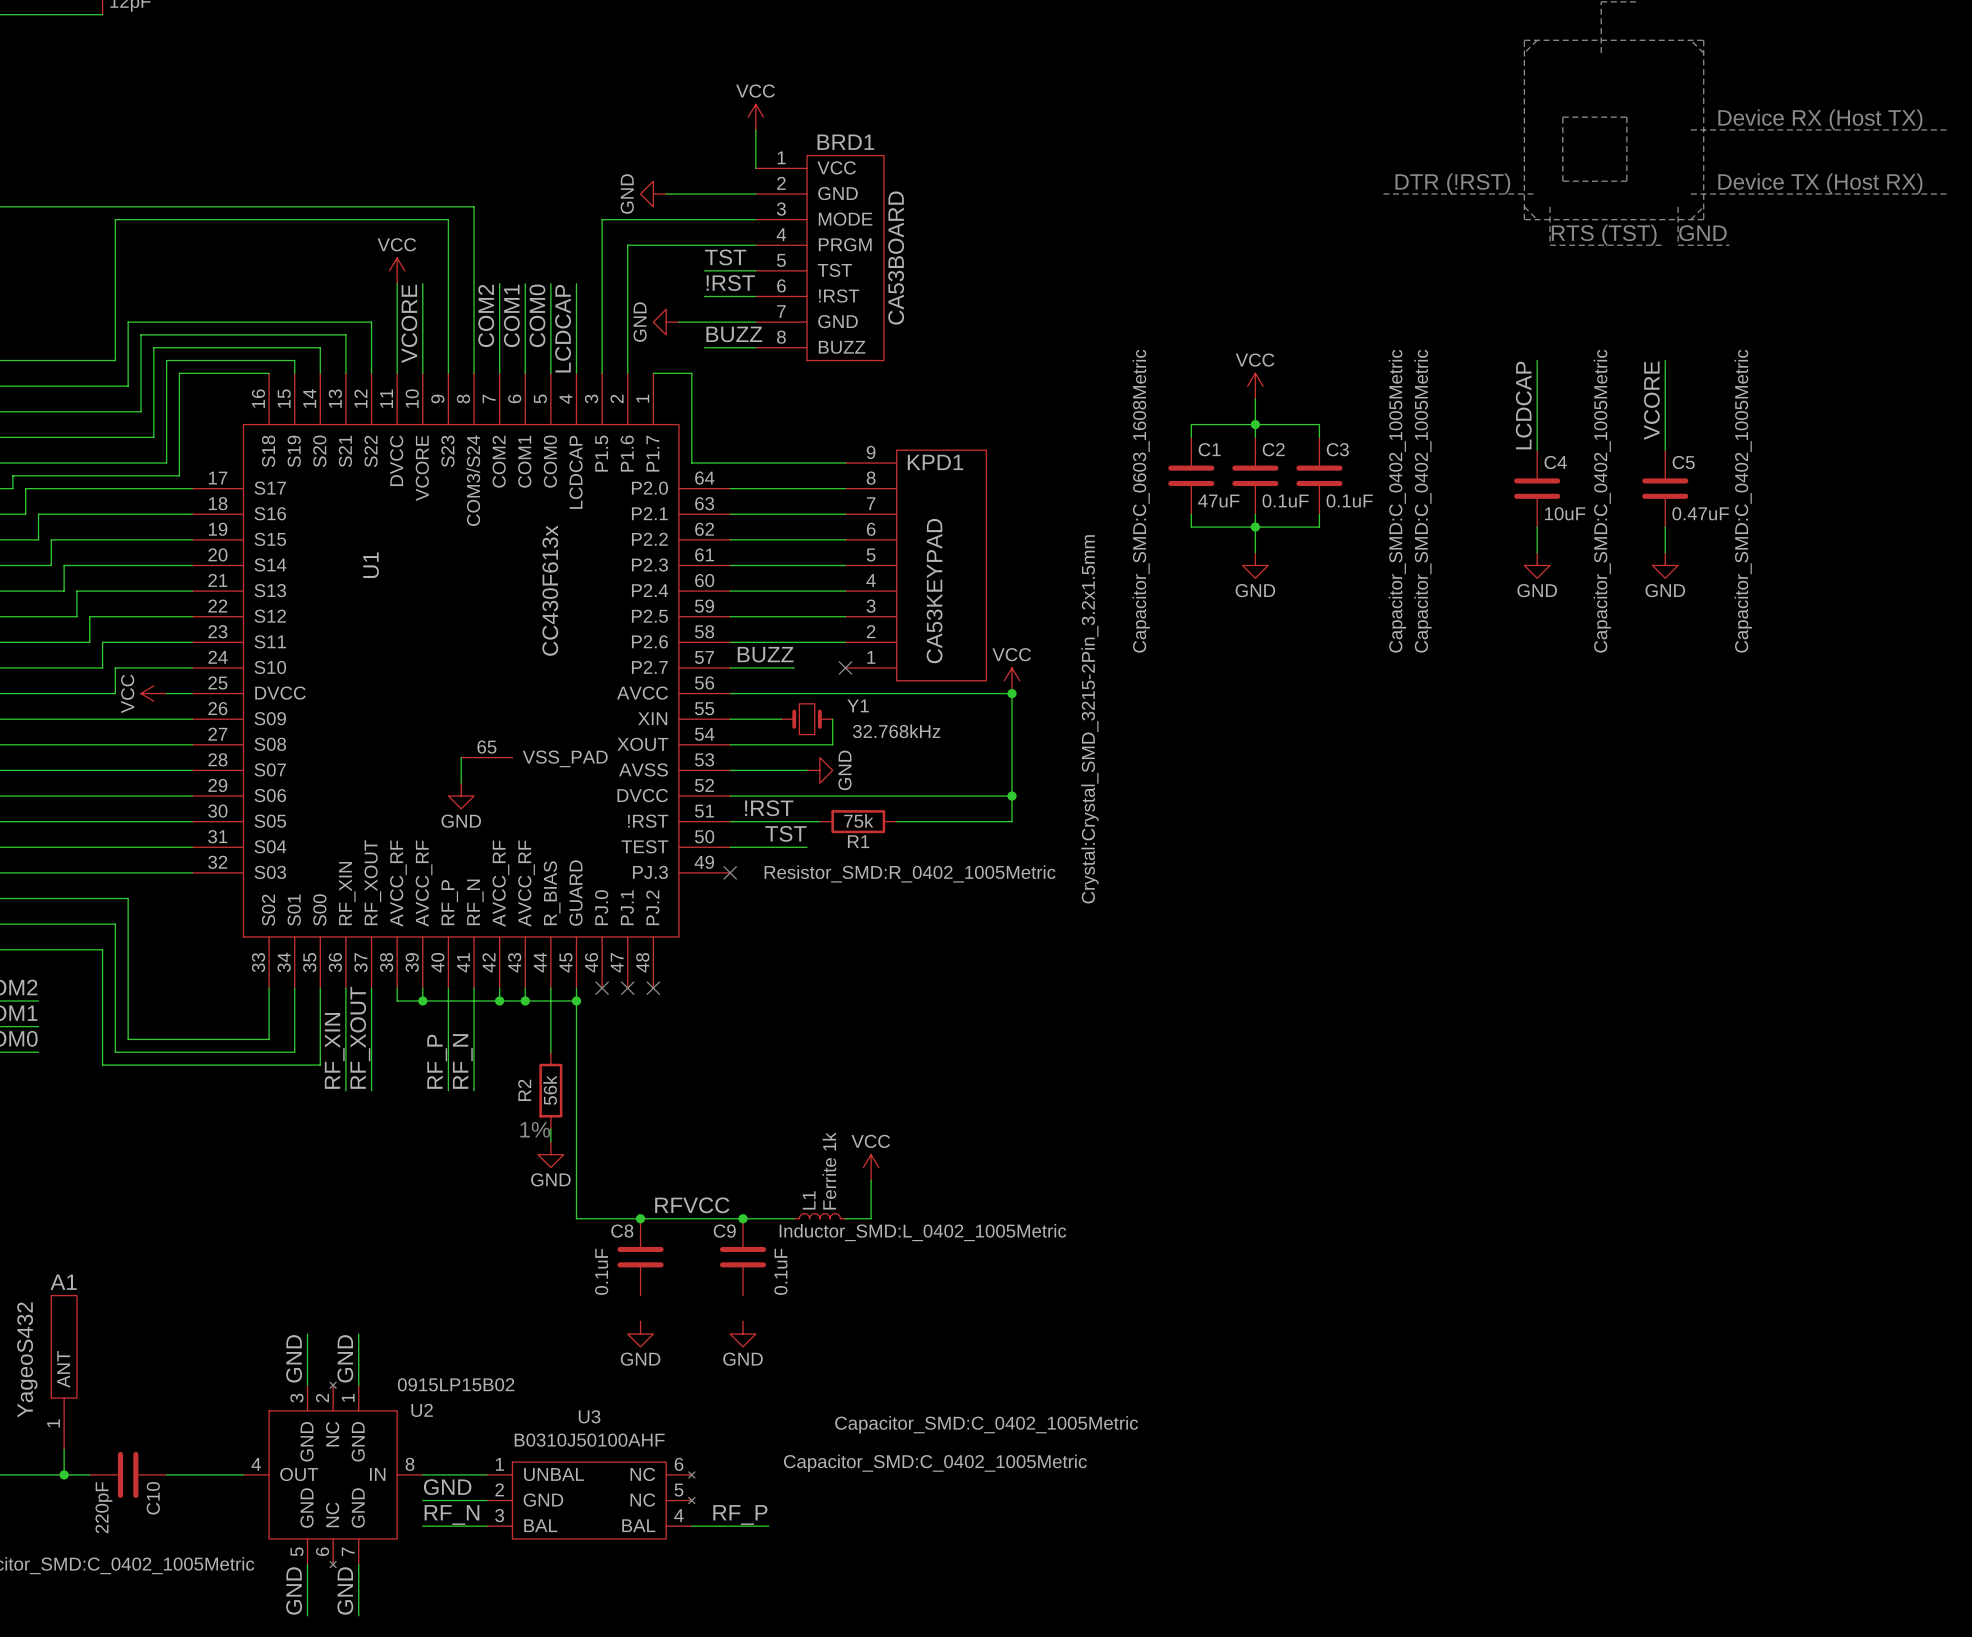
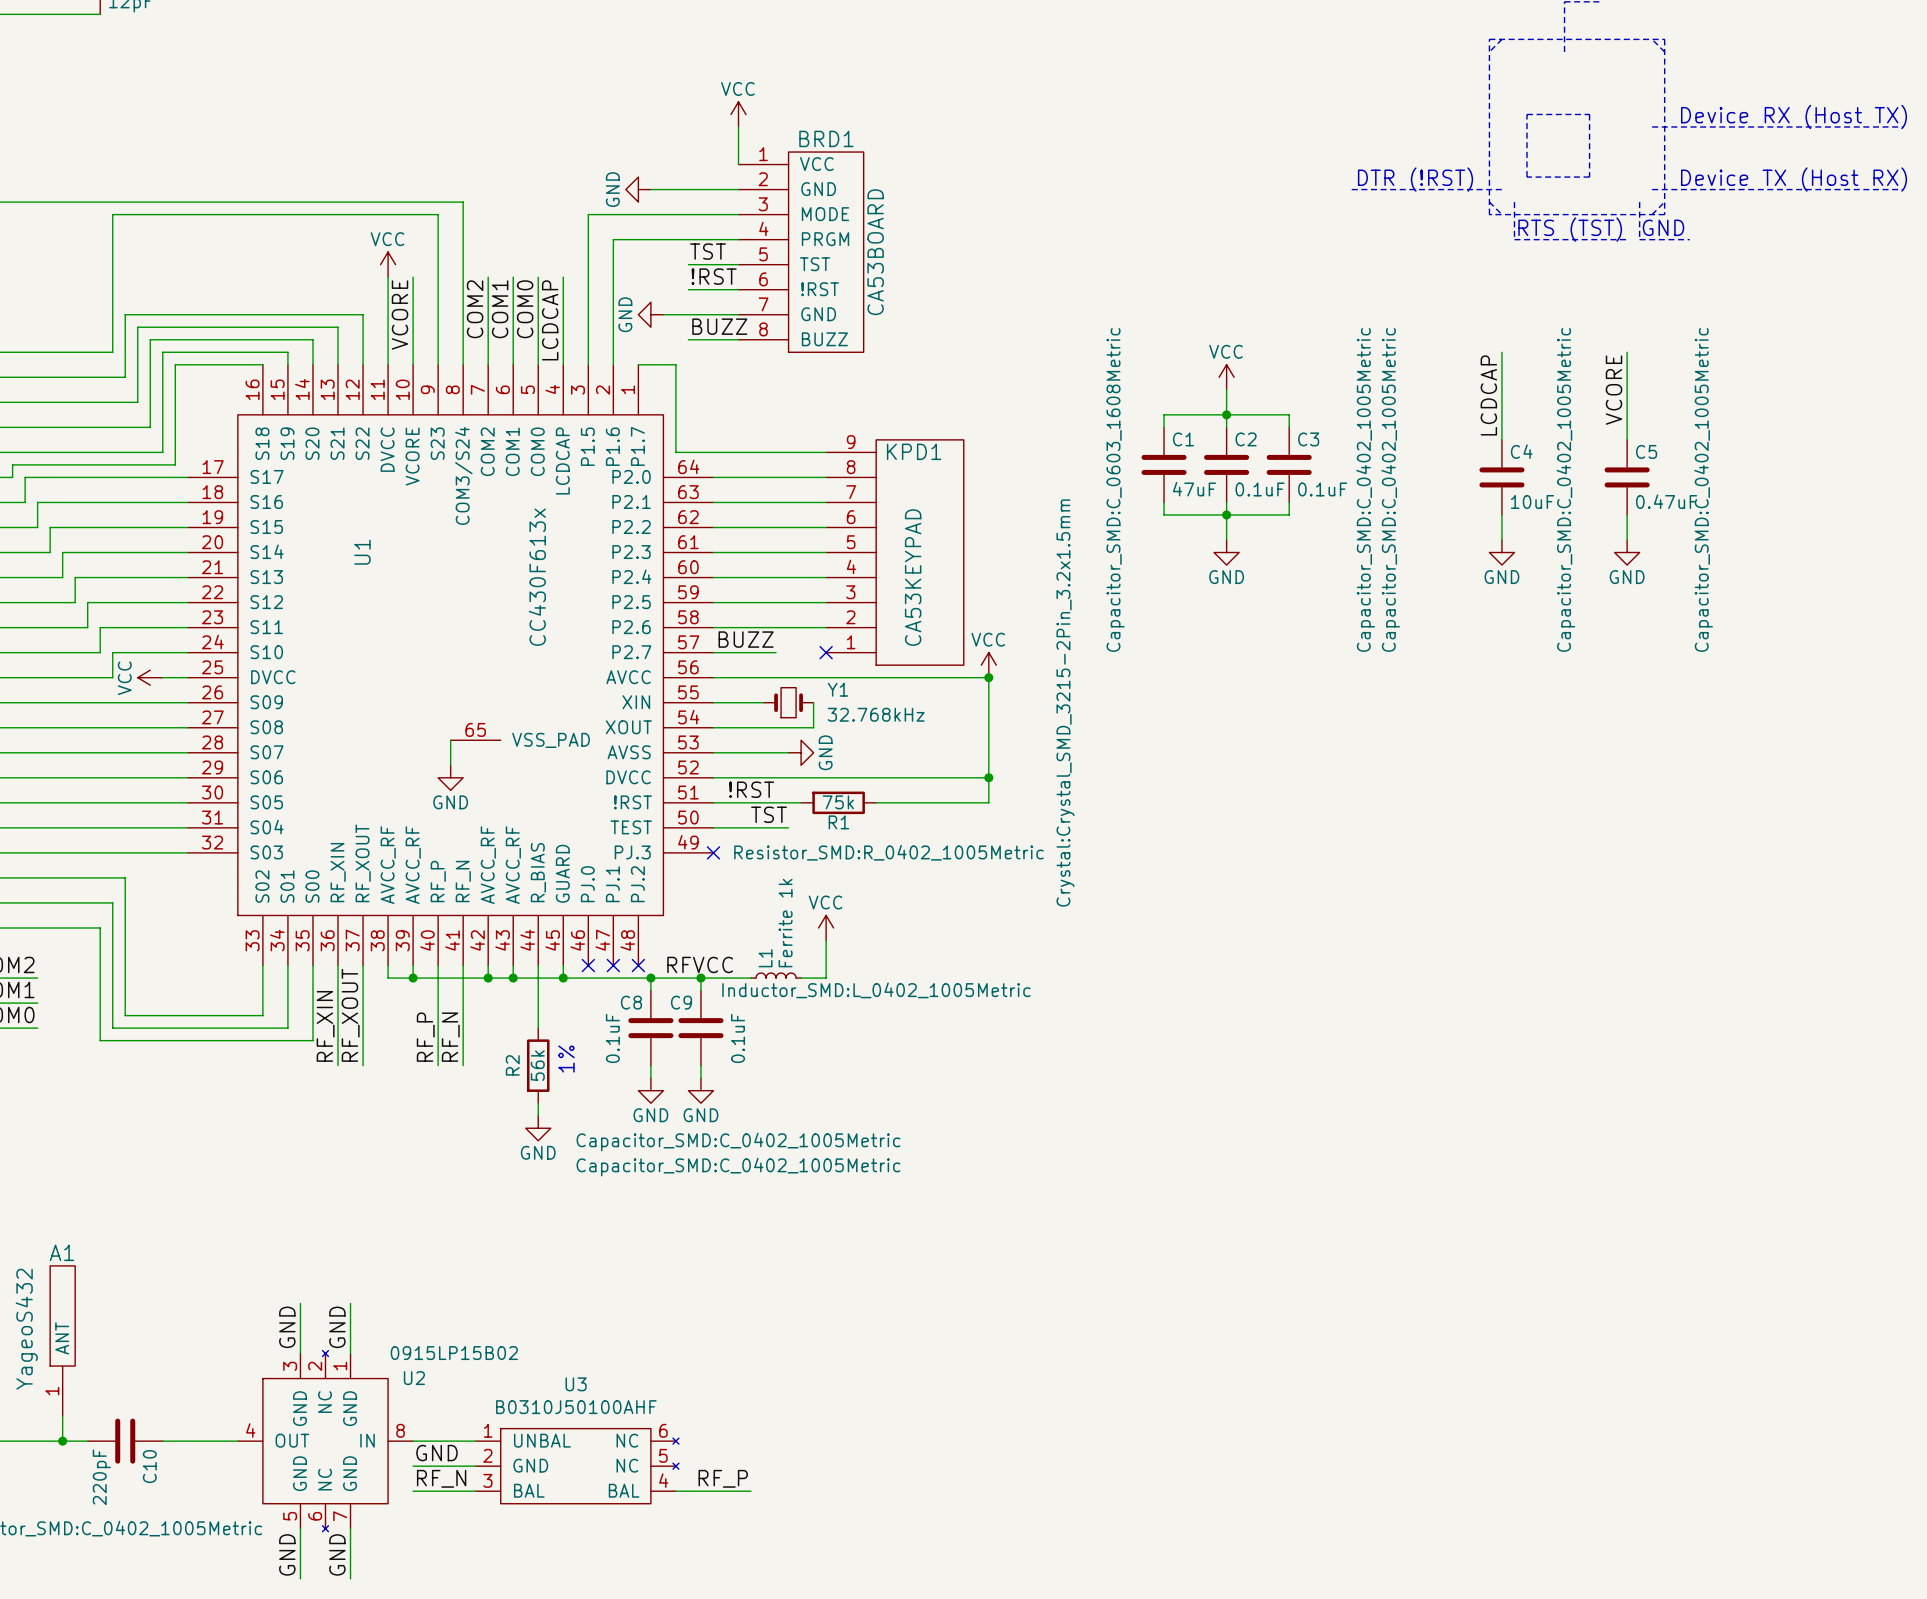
wire: (576, 1000) (576, 1218) (794, 1218) -> (563, 978) (751, 978)
wire: none -> (650, 978) (650, 990)
junction: none -> (650, 978)
wire: none -> (700, 978) (700, 990)
junction: none -> (700, 978)
wire: none -> (650, 1065) (650, 1078)
wire: none -> (700, 1065) (700, 1078)
power symbol: none -> GND (650, 1090)
power symbol: none -> GND (700, 1090)
text rotation: 0° (535, 1129) -> 90° counterclockwise (566, 1058)
text position: 1% (535, 1129) -> 1% (566, 1058)
power symbol position: VCC (871, 1167) -> VCC (826, 927)
wire: (871, 1180) (871, 1218) (845, 1218) -> (826, 940) (826, 978) (801, 978)
label position: RFVCC (692, 1205) -> RFVCC (700, 964)
L1 position: (819, 1216) -> (776, 975)
junction: (640, 1218) -> none
junction: (743, 1218) -> none
C8 position: (640, 1257) -> (650, 1028)
C9 position: (743, 1257) -> (700, 1028)
power symbol: GND (640, 1334) -> none
power symbol: GND (743, 1334) -> none
C9 text position: Capacitor_SMD:C_0402_1005Metric (986, 1424) -> Capacitor_SMD:C_0402_1005Metric (738, 1142)
C8 text position: Capacitor_SMD:C_0402_1005Metric (935, 1463) -> Capacitor_SMD:C_0402_1005Metric (738, 1167)

